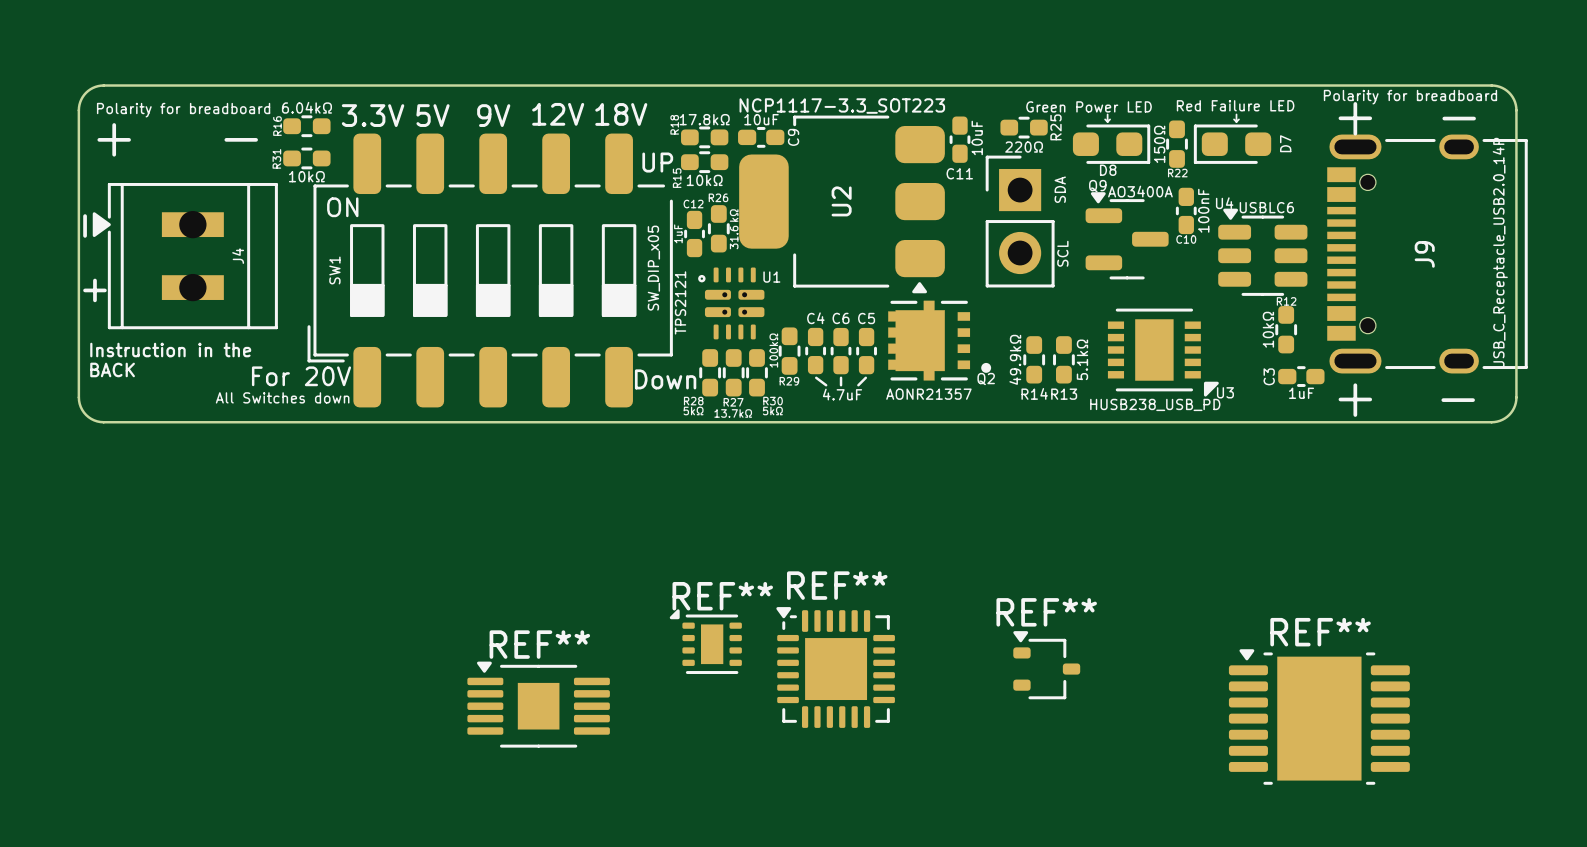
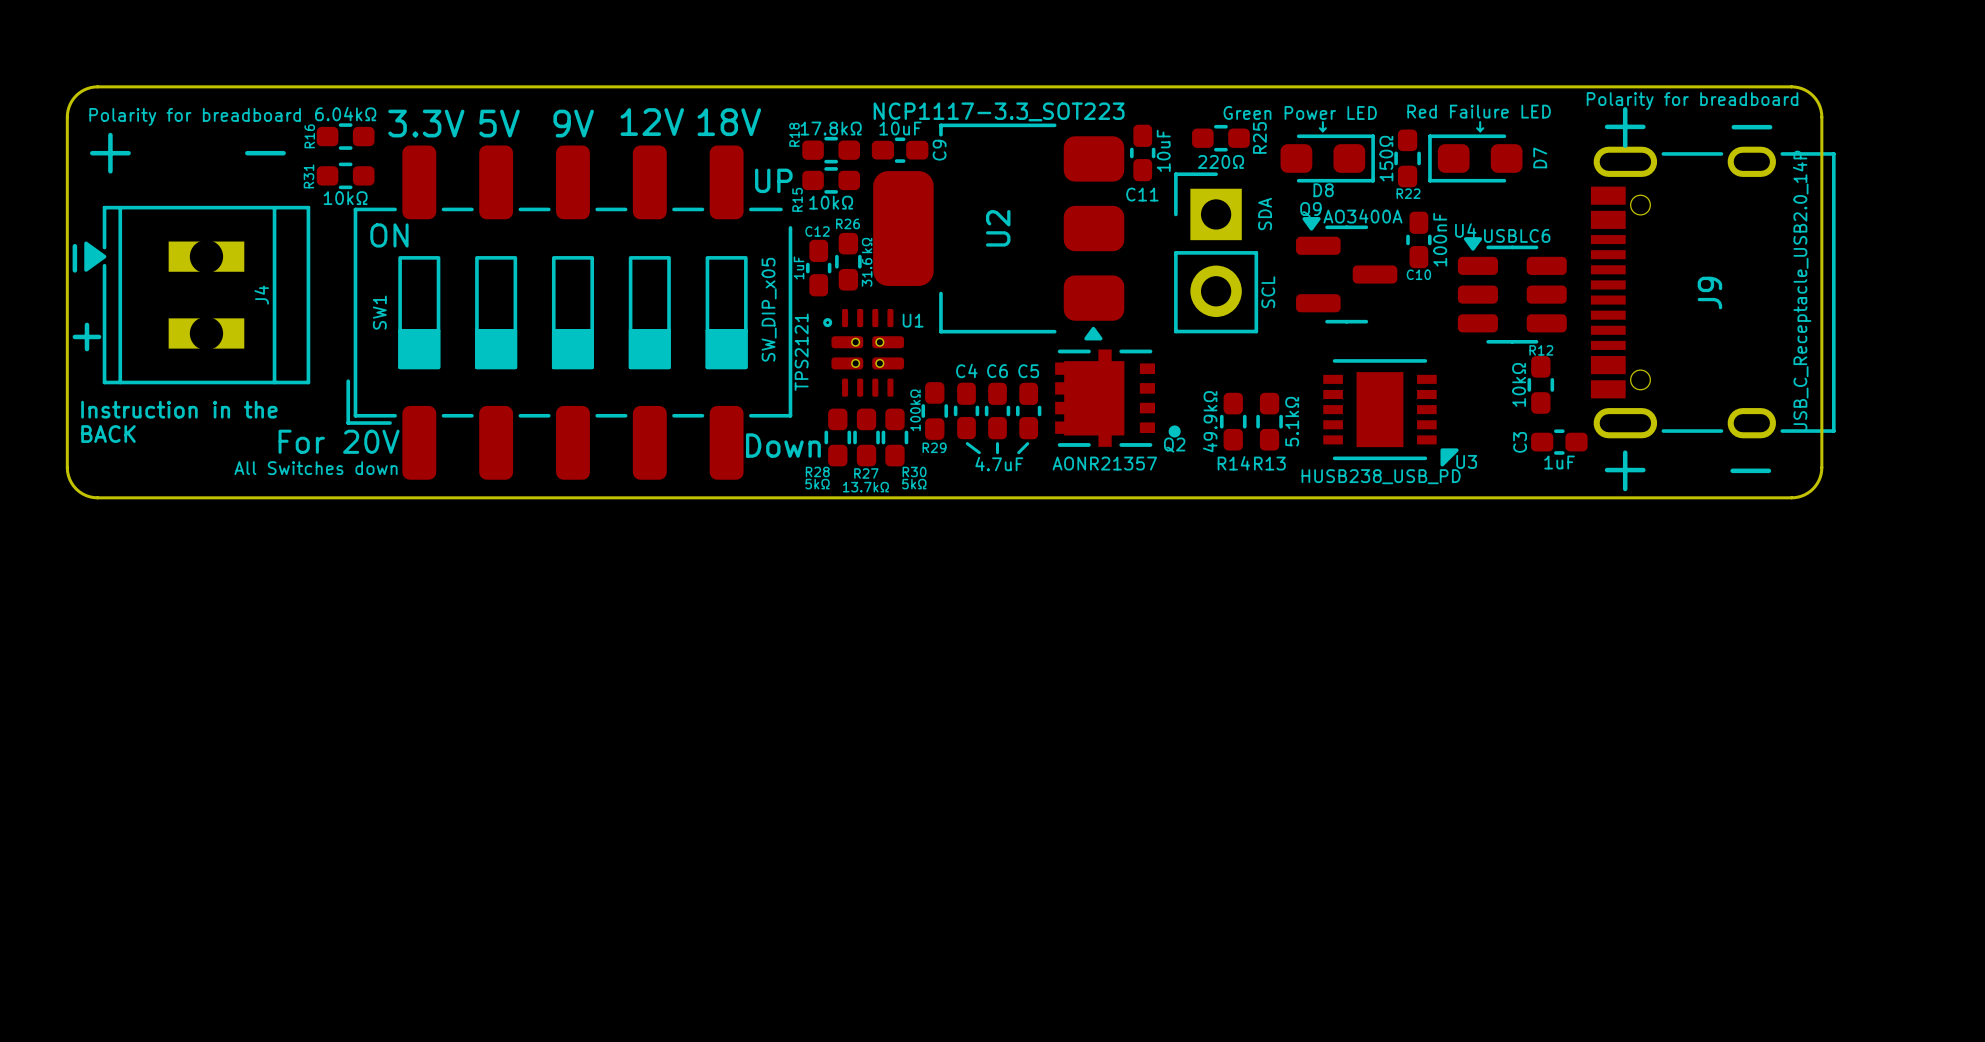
REF**: (705, 641) -> none
REF**: (1046, 665) -> none
REF**: (835, 667) -> none
REF**: (538, 704) -> none
REF**: (1319, 717) -> none

